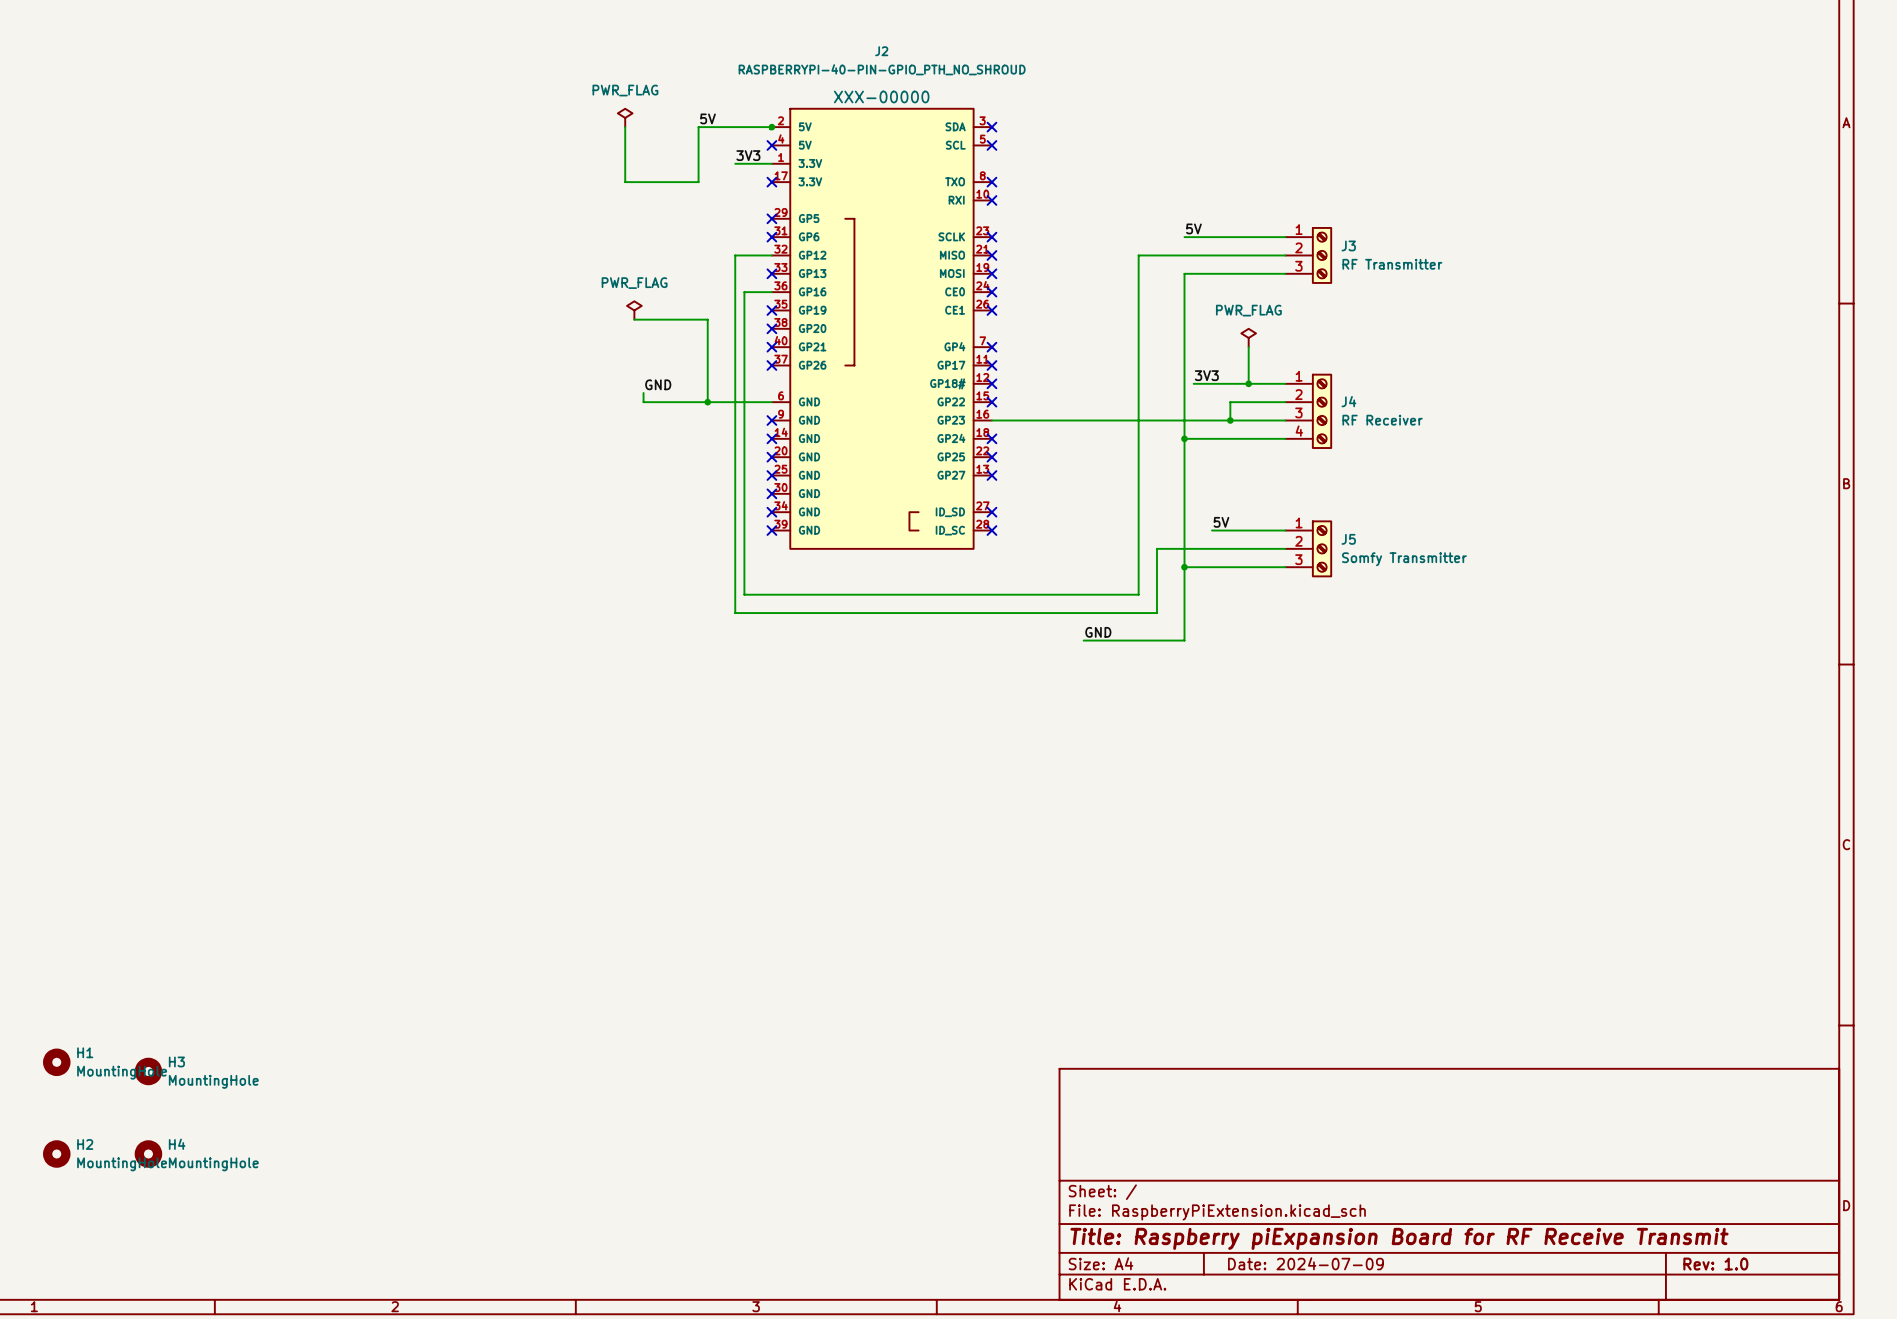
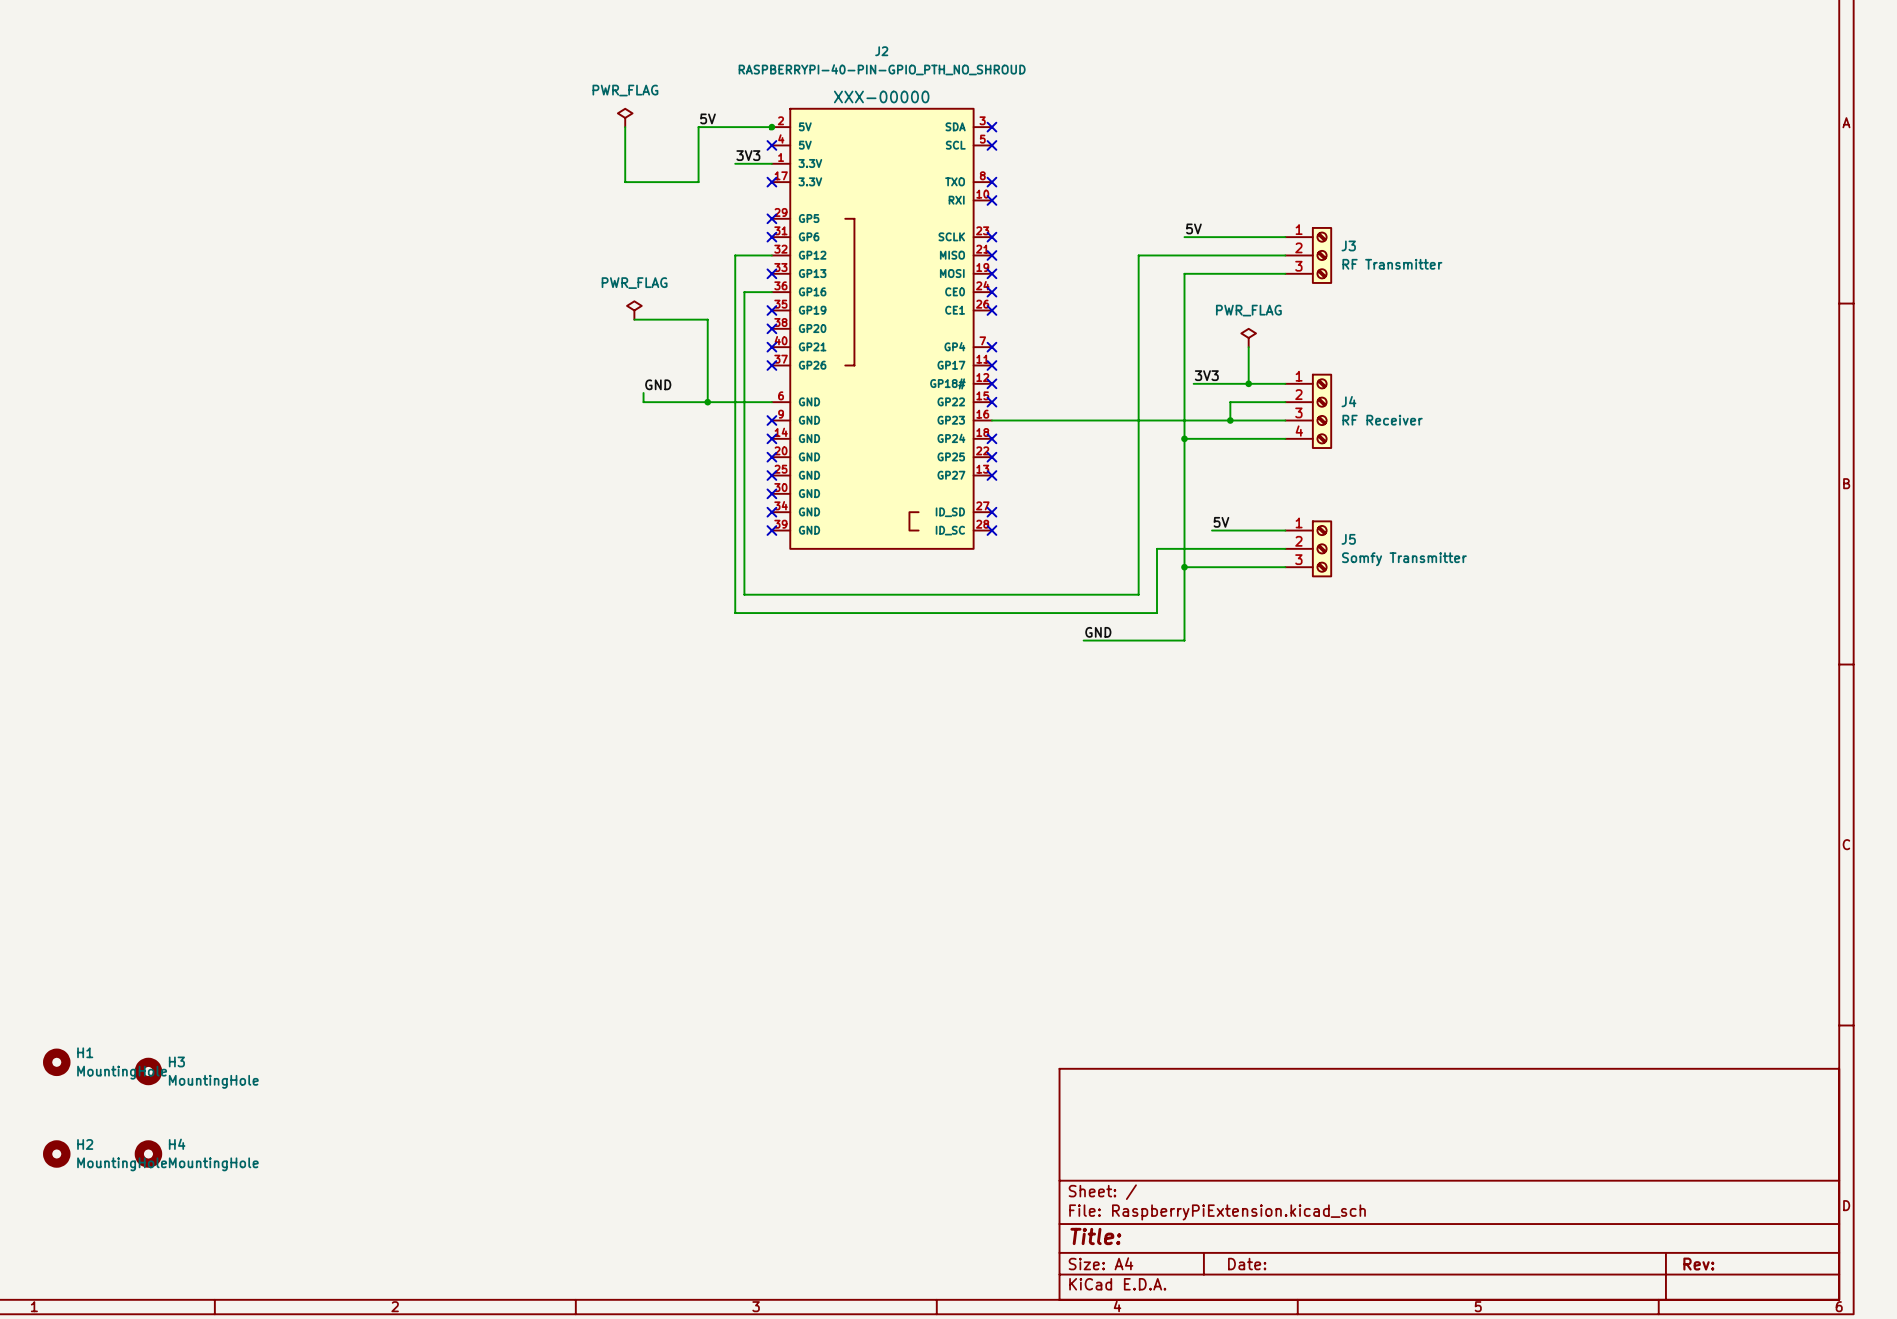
title block: Title: Raspberry piExpansion Board for RF Receive Transmit (1399, 1238) -> Title: (1095, 1236)
title block: Date: 2024-07-09 (1305, 1263) -> Date: (1247, 1264)
title block: Rev: 1.0 (1715, 1264) -> Rev: (1698, 1264)

